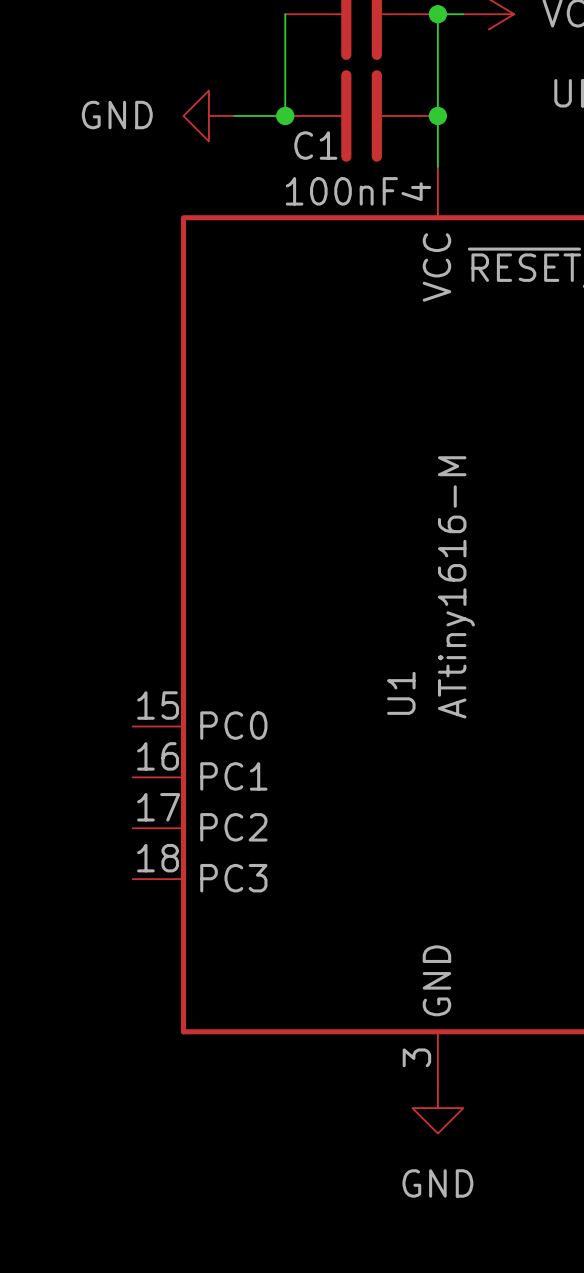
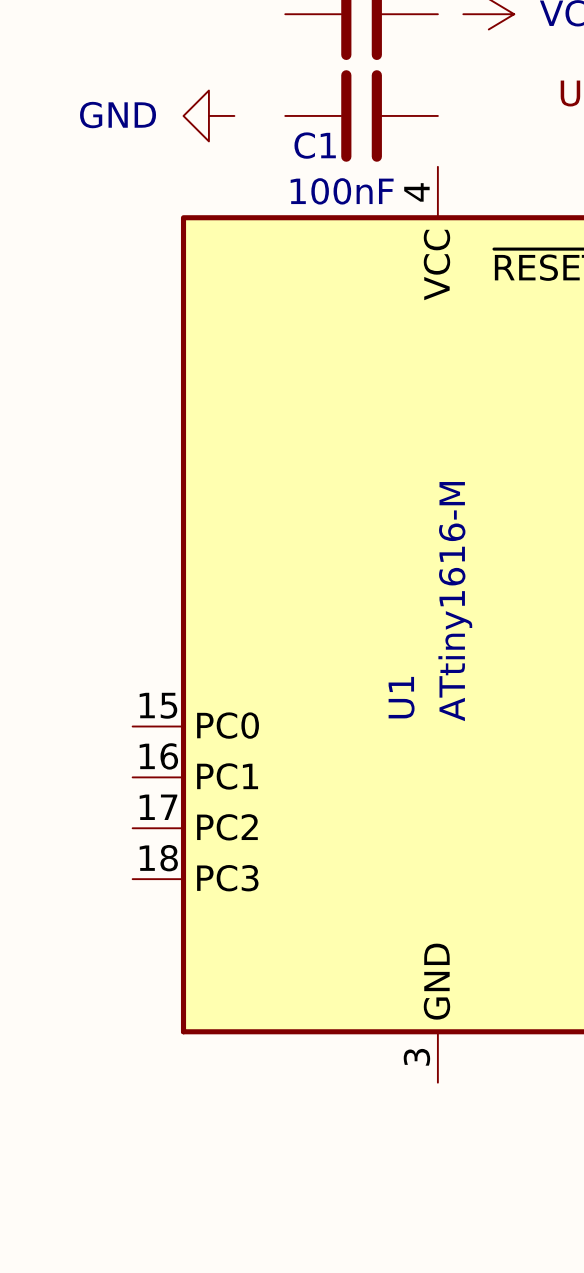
wire: (285, 14) (285, 115) (234, 115) -> none
junction: (437, 14) -> none
wire: (463, 14) (437, 14) (437, 166) -> none
junction: (285, 115) -> none
junction: (437, 115) -> none
power symbol: GND (437, 1108) -> none

